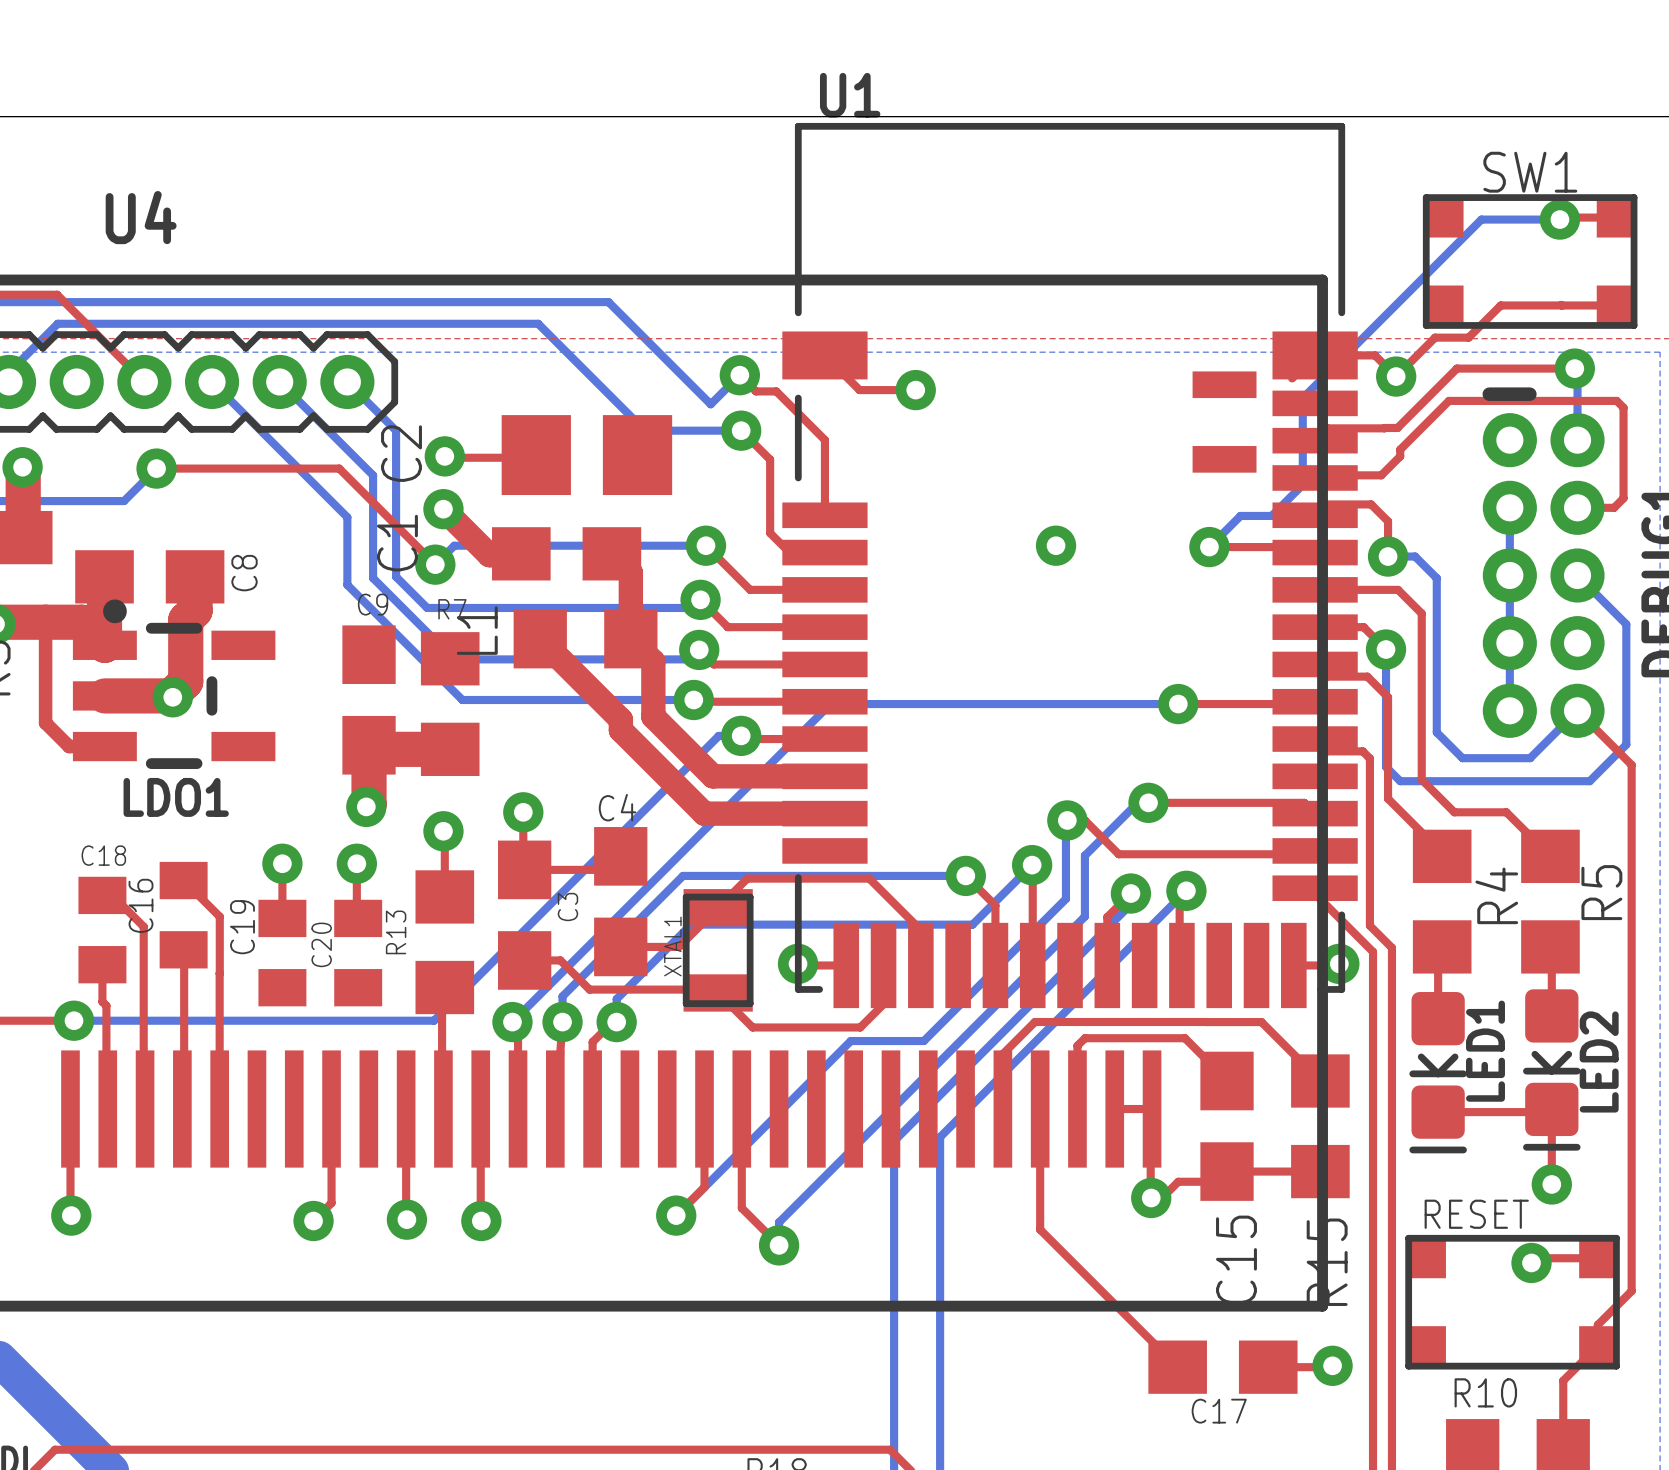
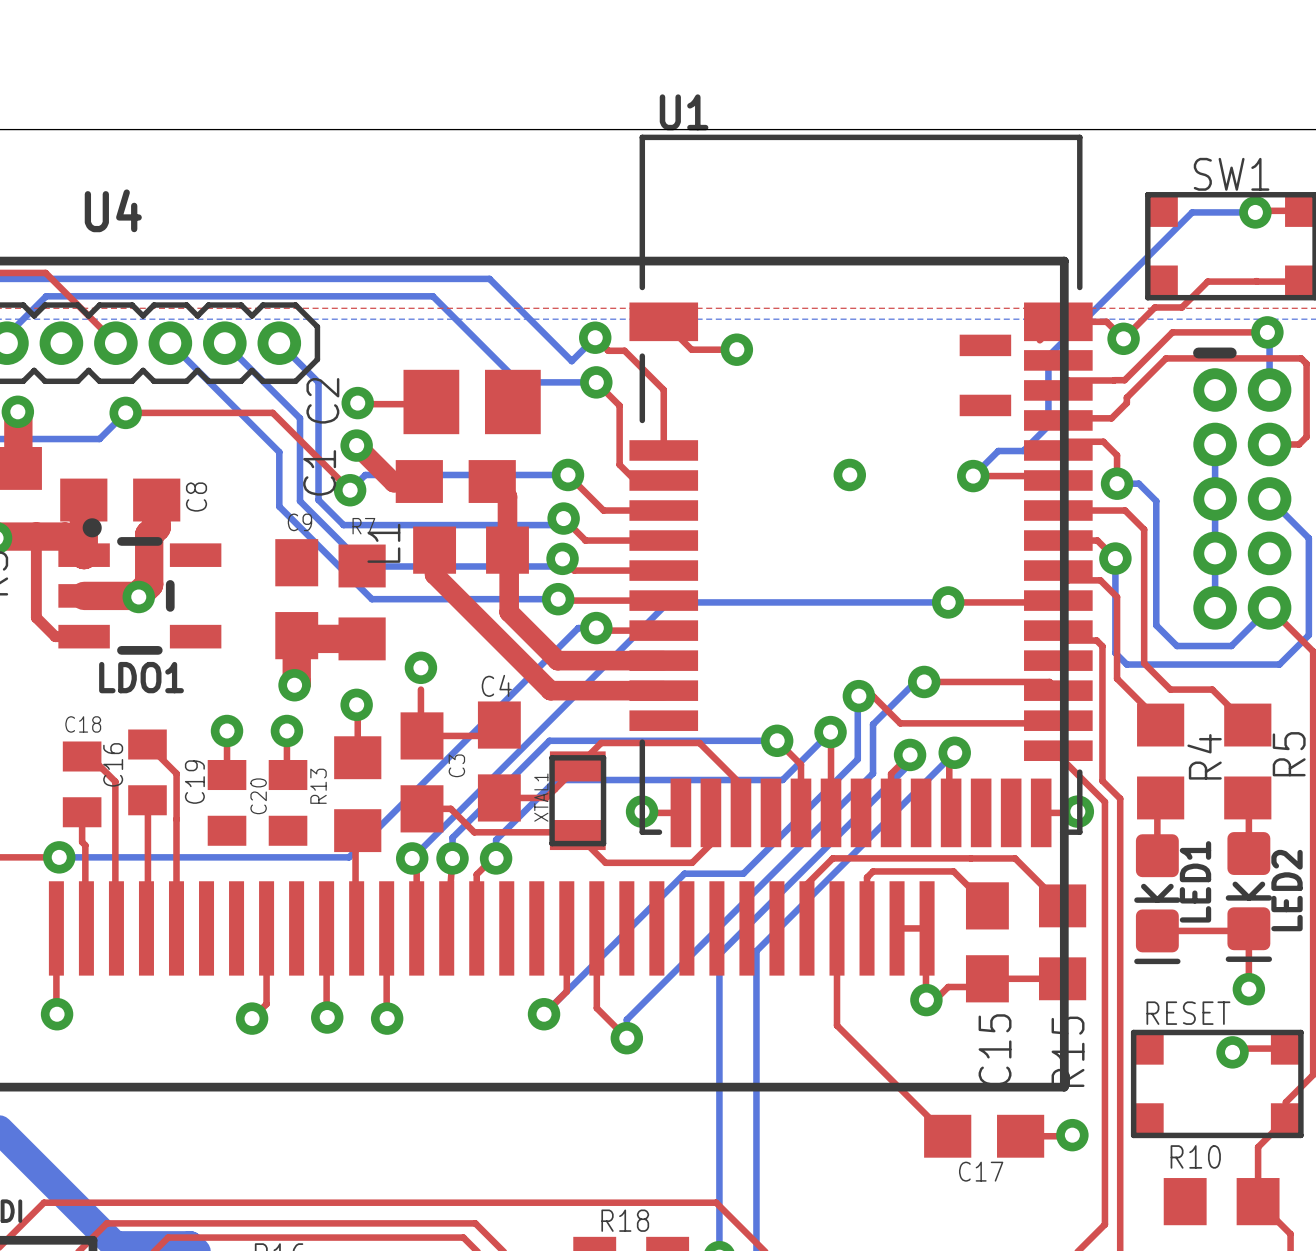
top track: (540, 639) (620, 719) (620, 730) (704, 813) -> (434, 550) (434, 574) (550, 690) (566, 690)
top track: (632, 641) (653, 661) (653, 716) (712, 776) -> (509, 551) (509, 612) (557, 660) (573, 660)
via position: (523, 812) -> (420, 667)

